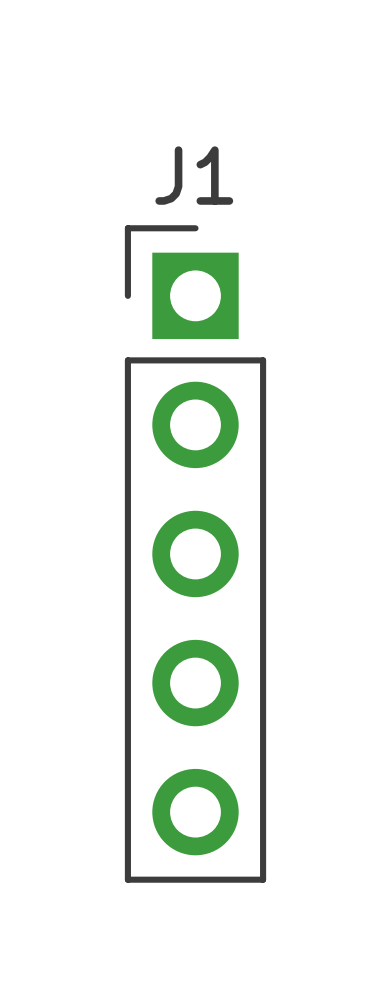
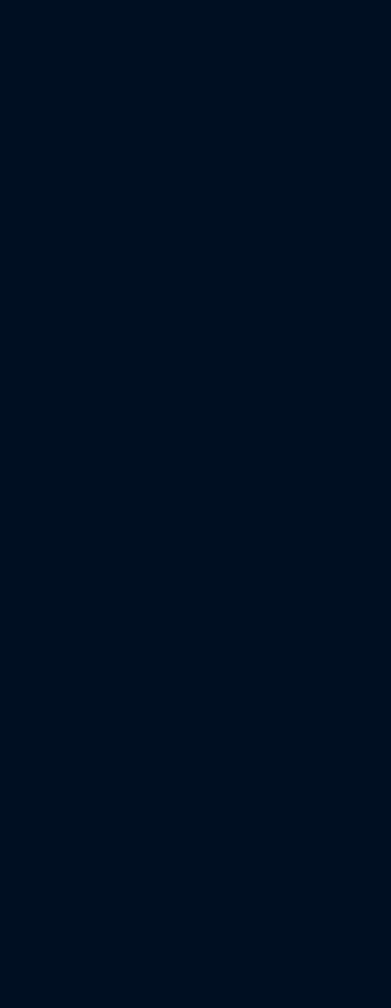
J1: (195, 553) -> none

